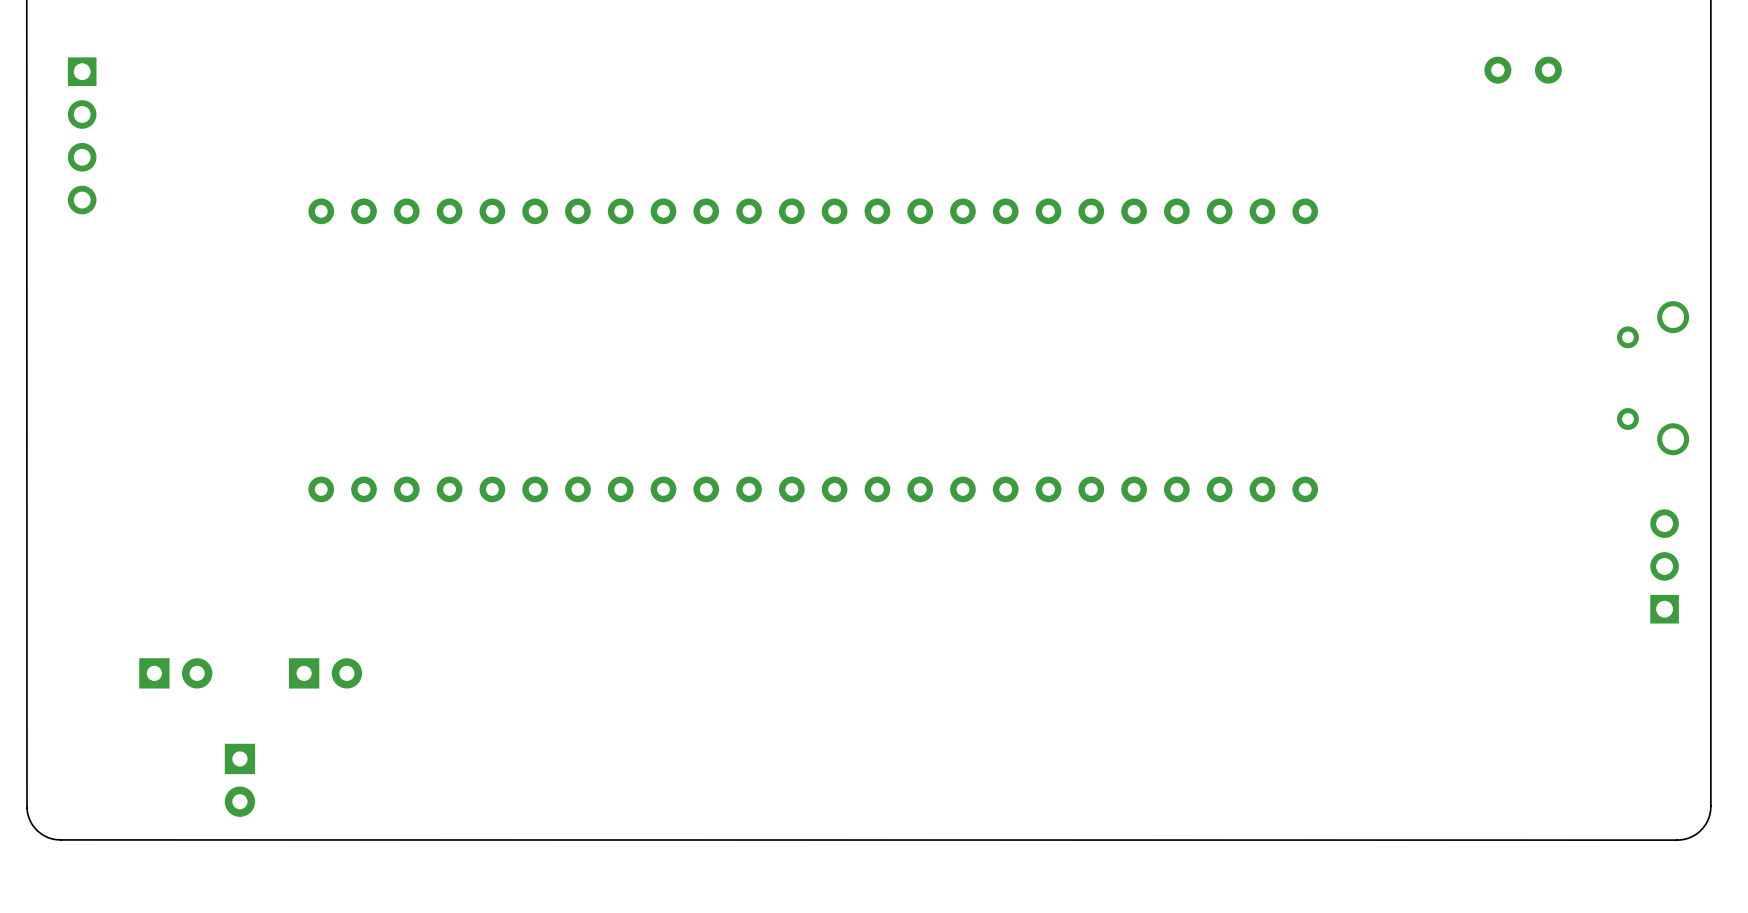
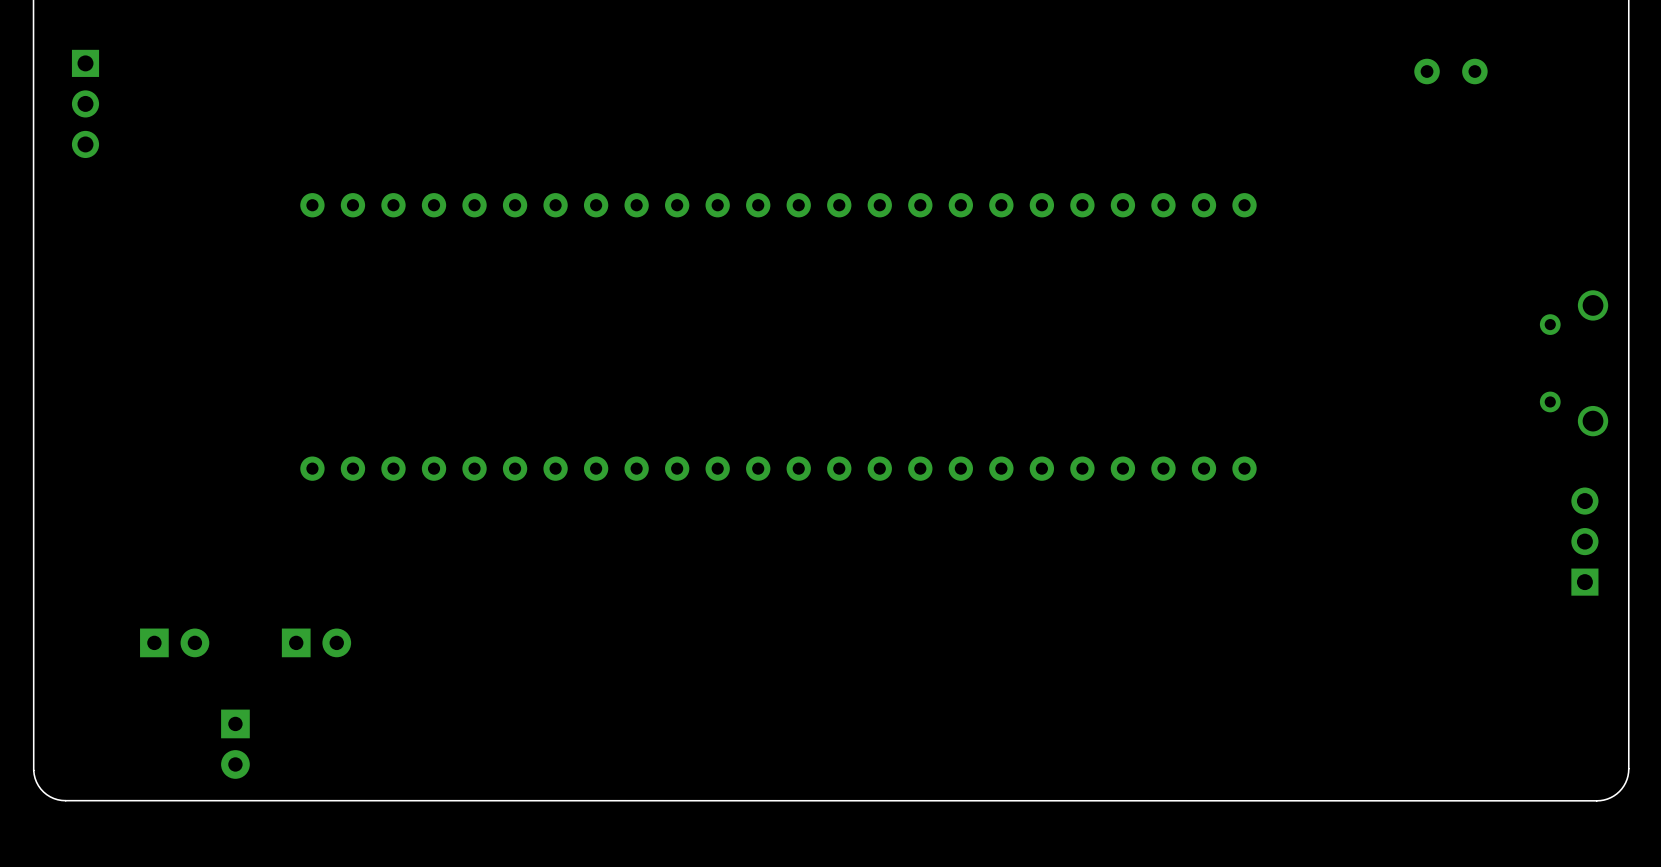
part: none -> (85, 103)
part: (82, 135) -> none

